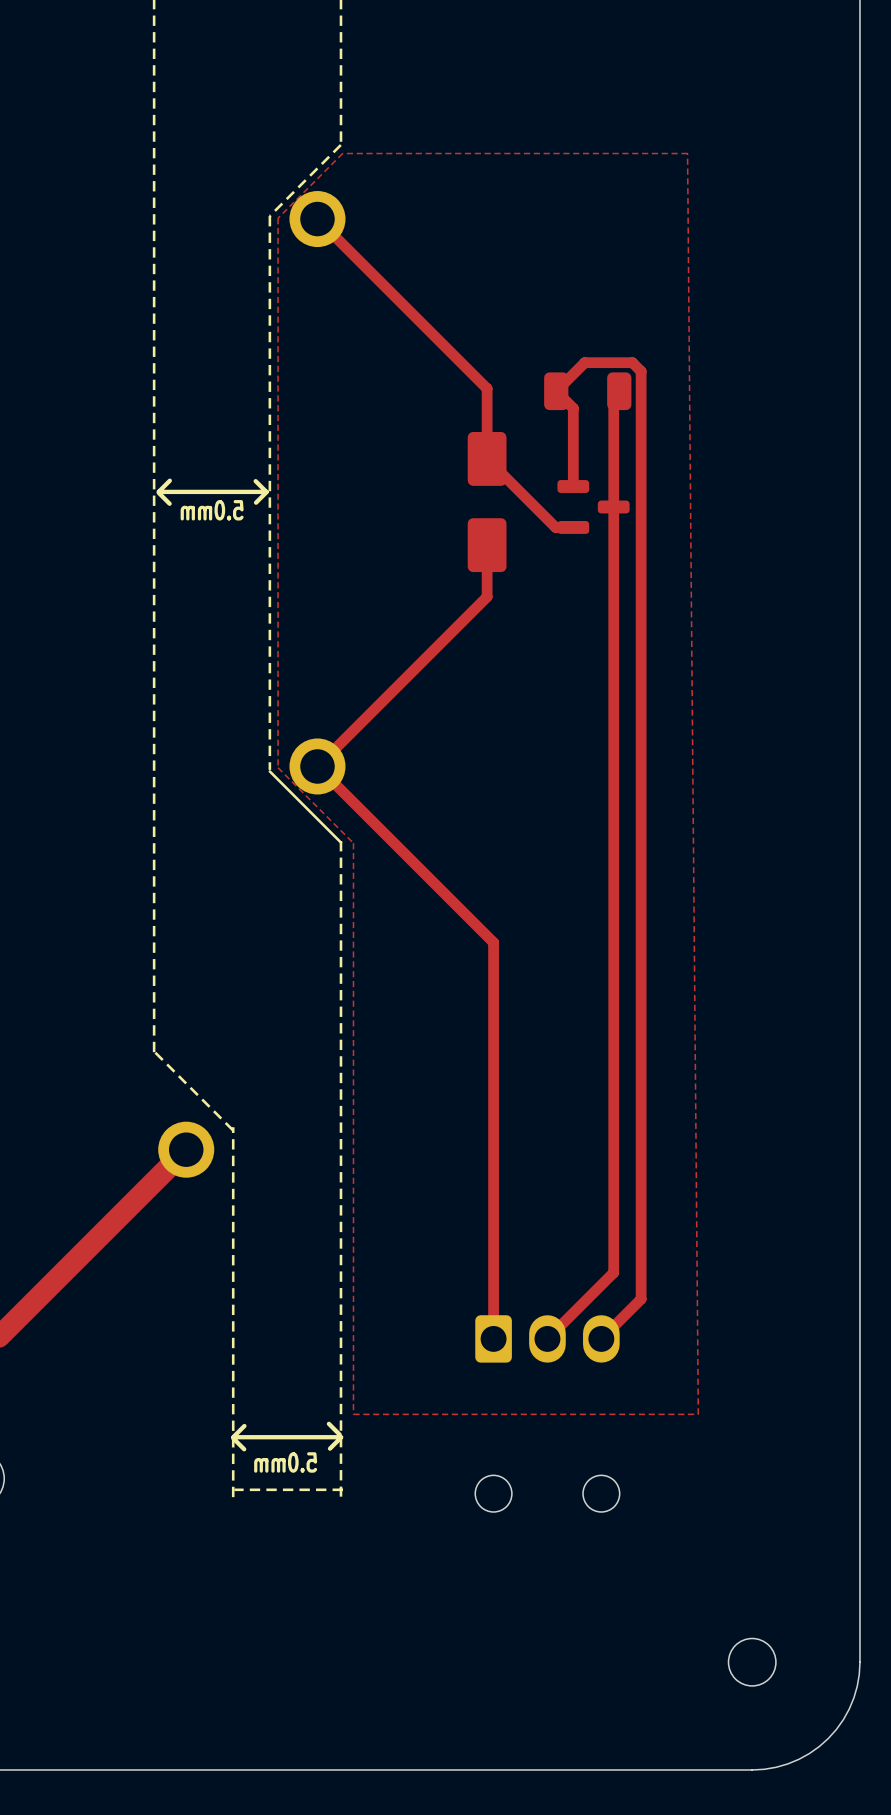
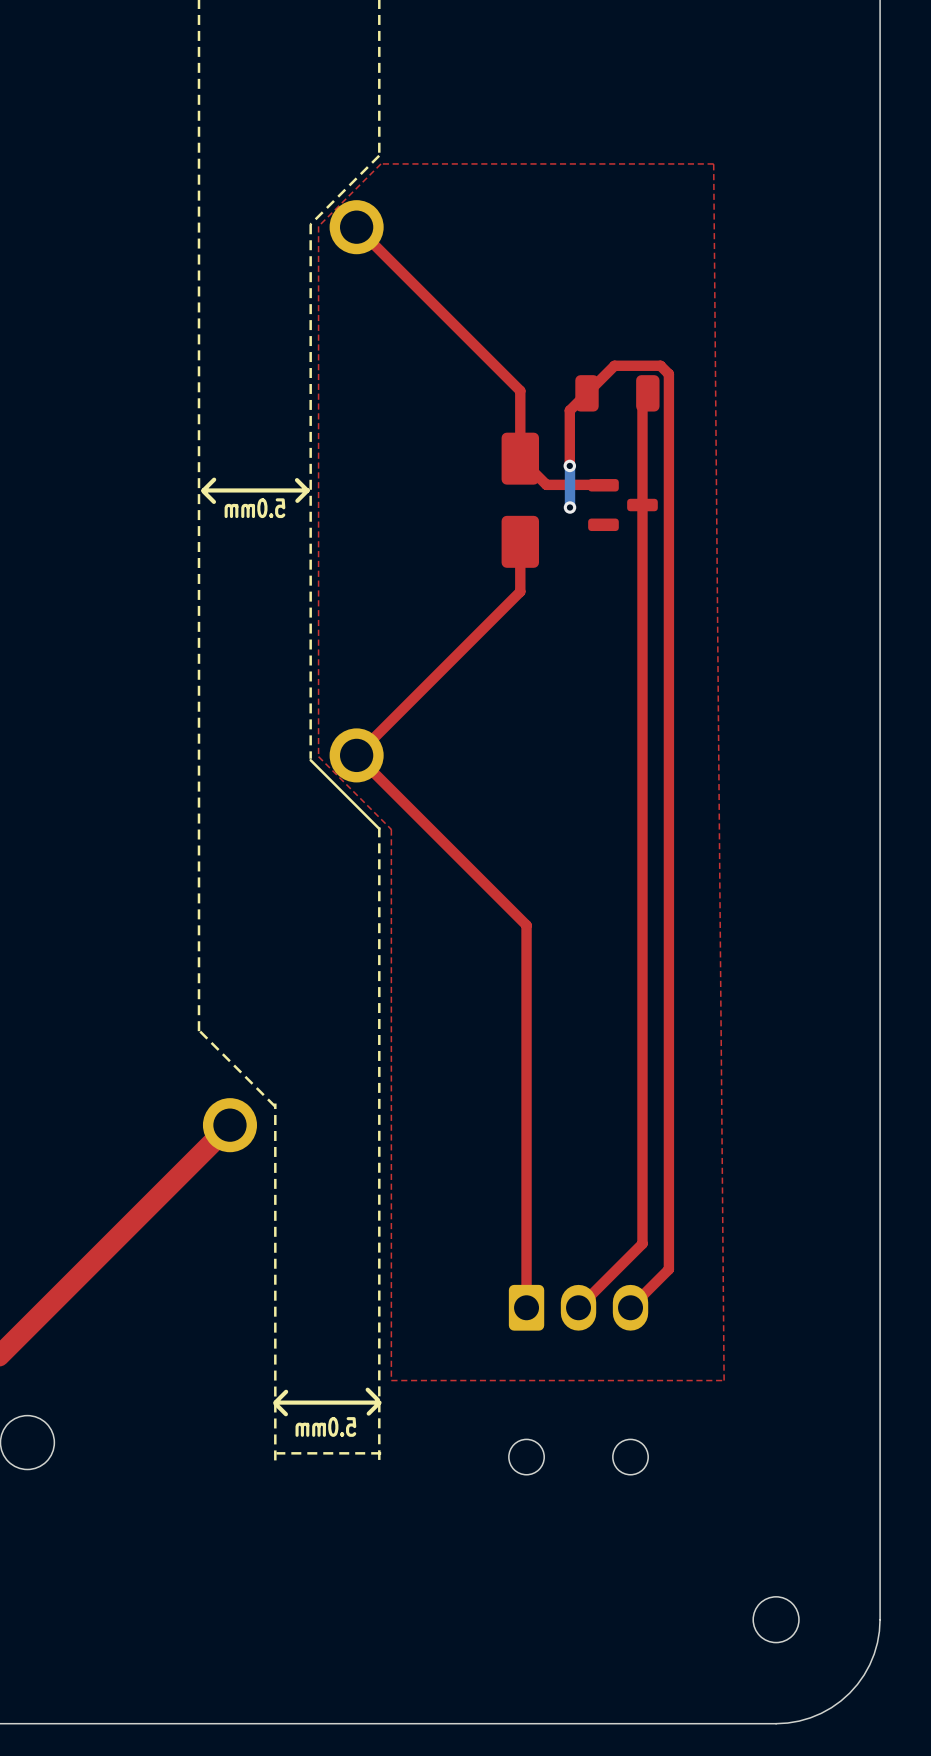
top track: (556, 391) (573, 408) (573, 486) -> (587, 393) (569, 410) (569, 465)
bottom track: none -> (570, 466) (570, 507)
via: none -> (569, 465)
top track: (514, 486) (555, 527) (573, 527) -> (546, 484) (598, 484)
via: none -> (570, 507)

